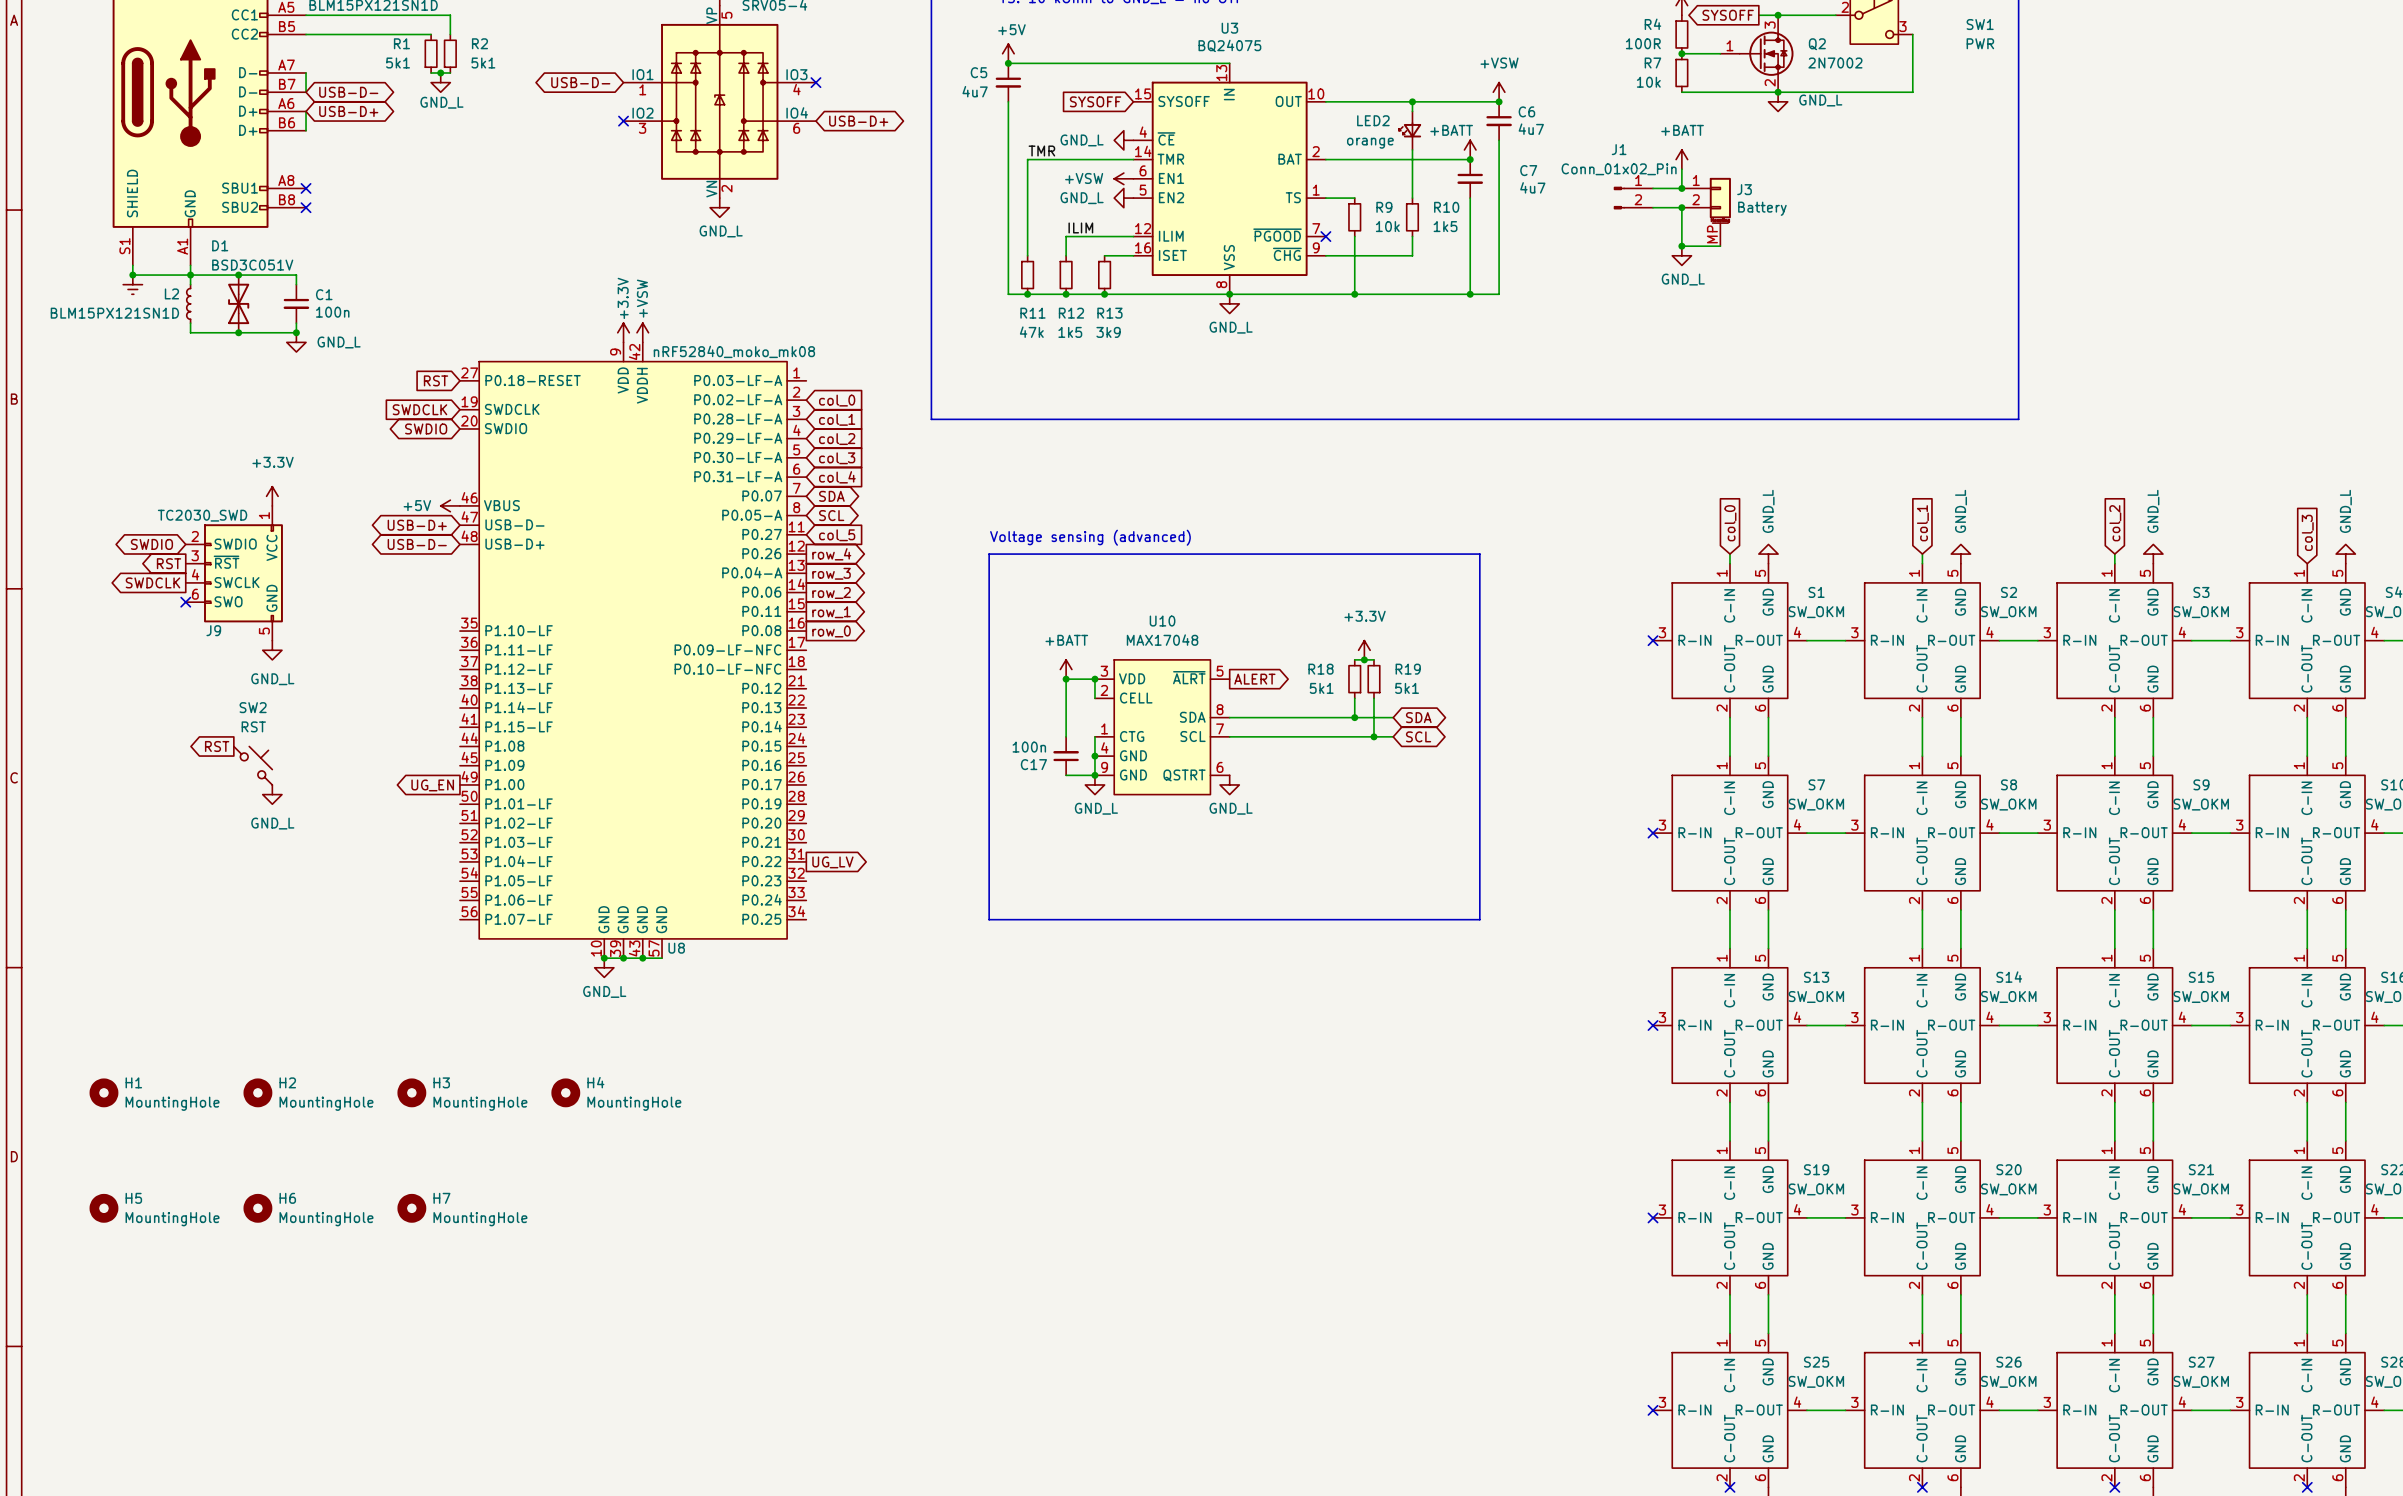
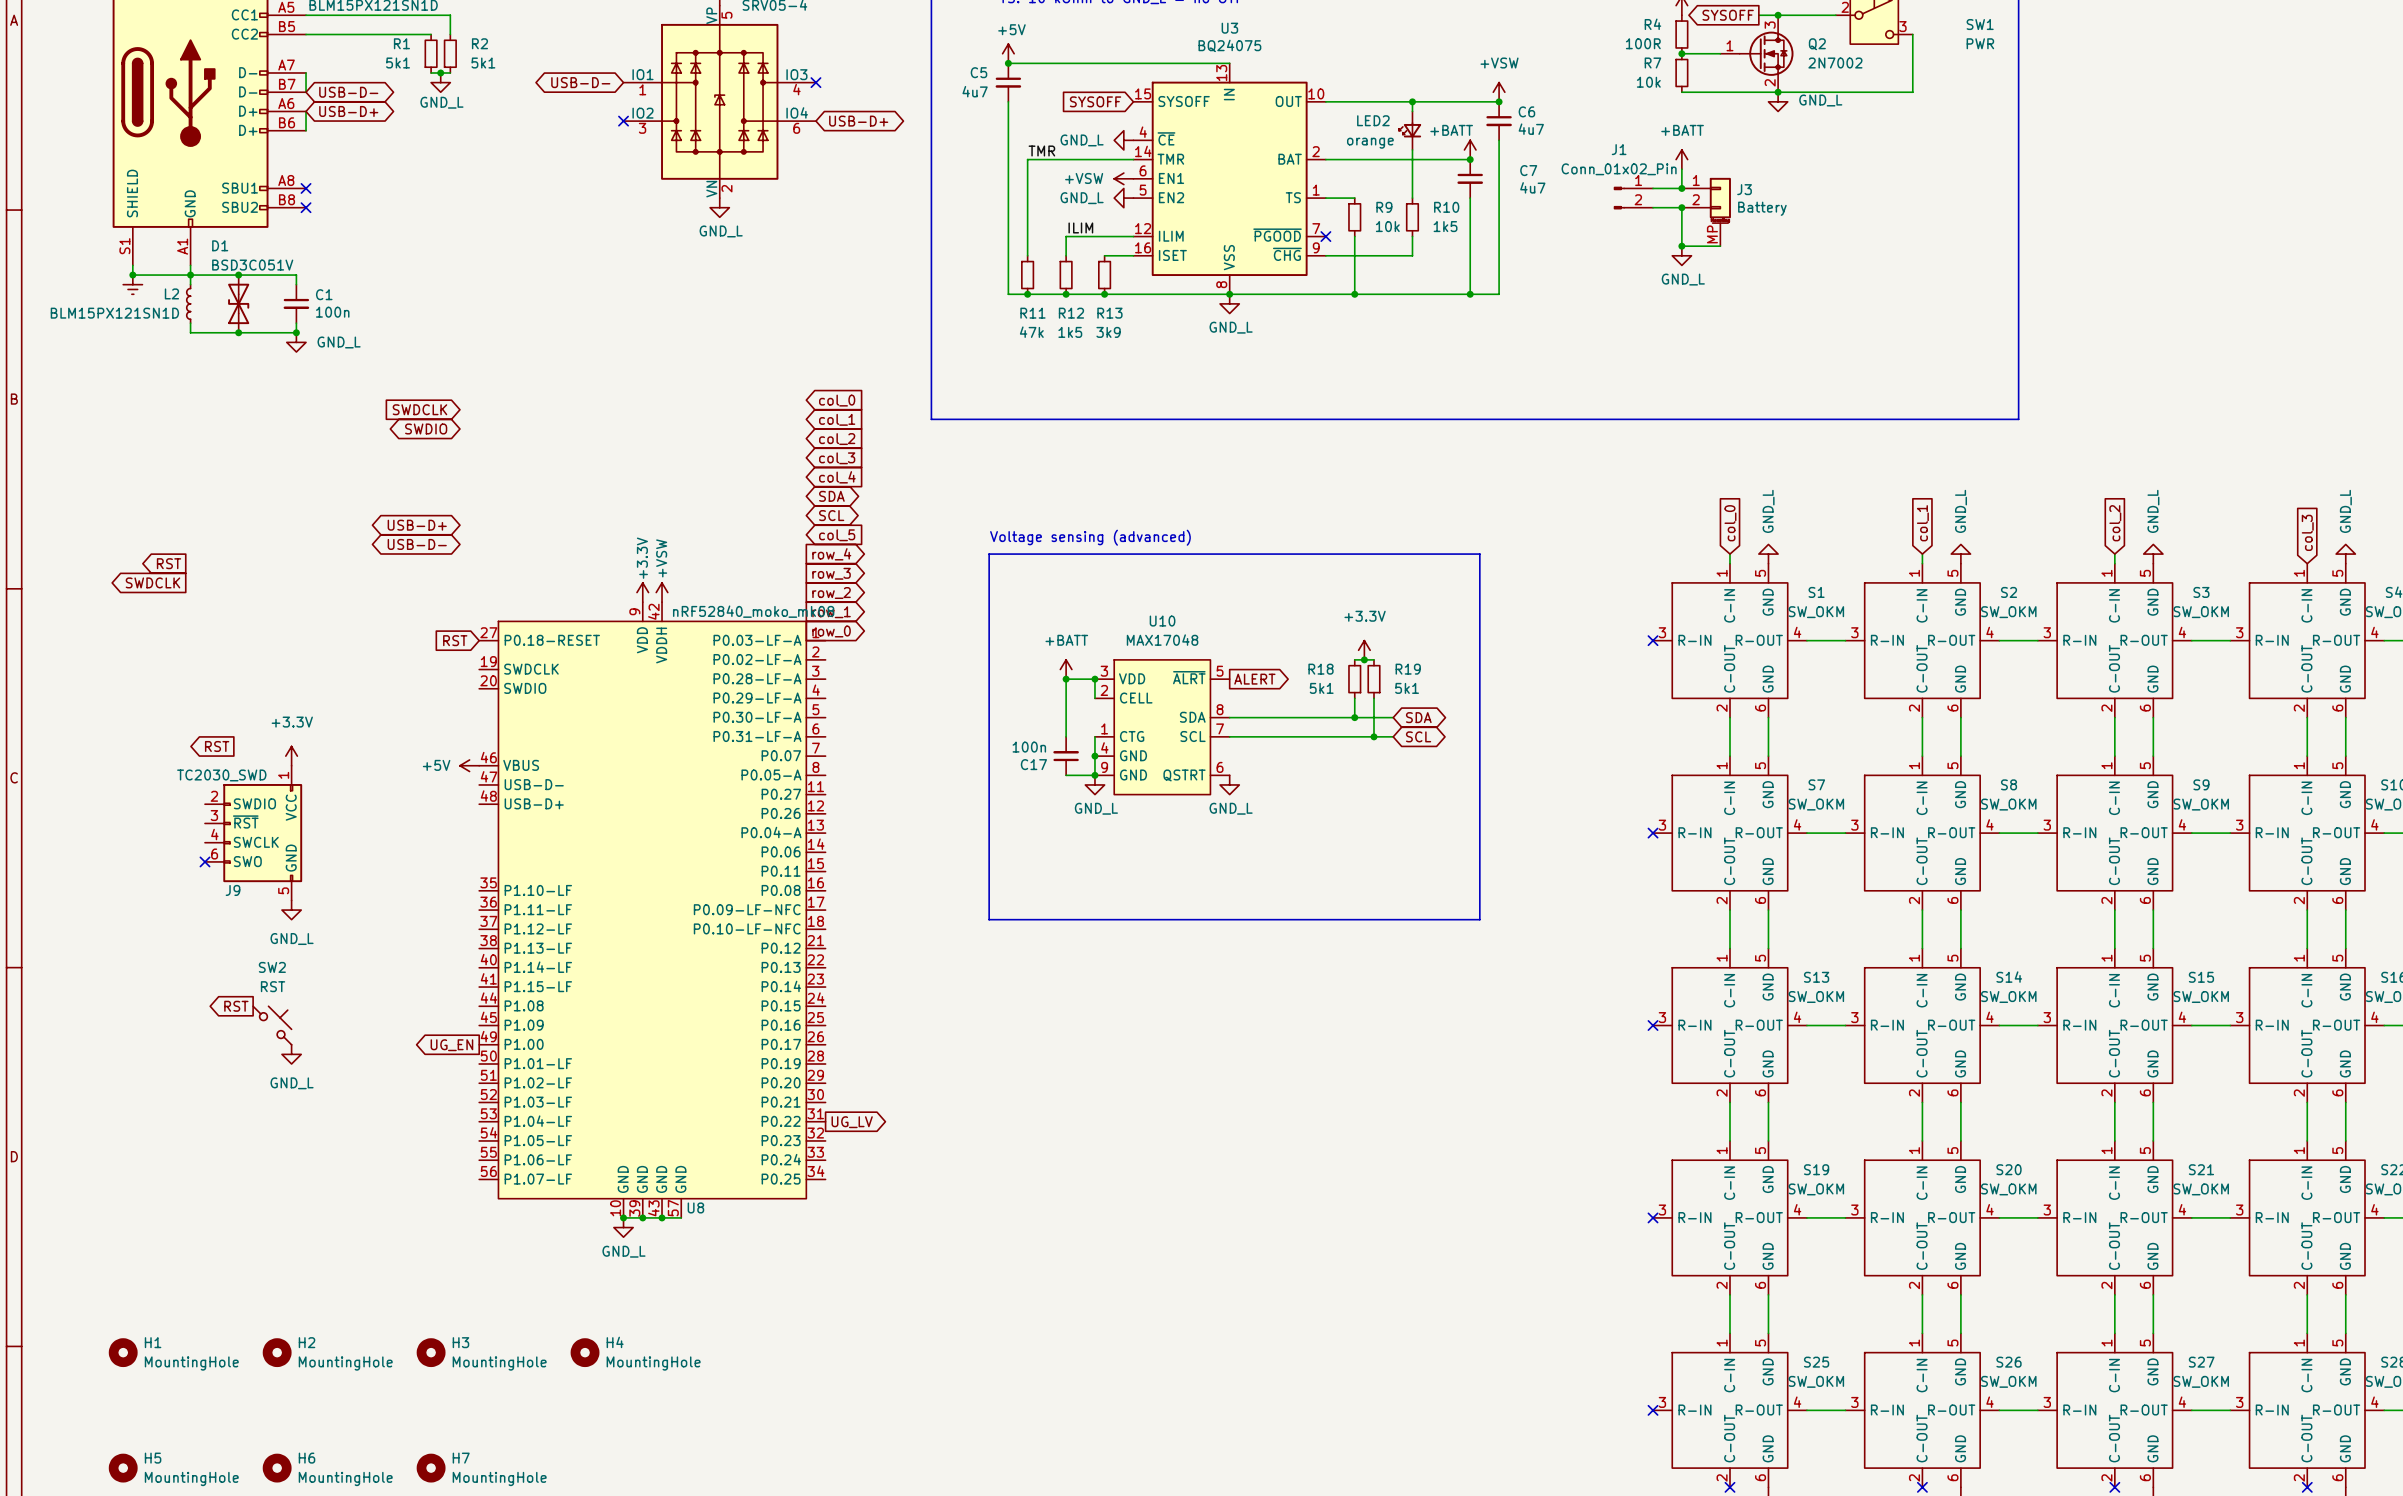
power symbol: +3.3V (623, 332) -> none
power symbol: +VSW (642, 332) -> none
global label: RST (436, 380) -> none
power symbol: +3.3V (272, 496) -> none
power symbol: +5V (450, 505) -> none
global label: SWDIO (151, 544) -> none
J9 position: (234, 573) -> (253, 833)
power symbol: none -> +3.3V (642, 592)
power symbol: none -> +VSW (662, 592)
no-connect mark: (185, 602) -> none
global label: none -> RST (455, 640)
power symbol: GND_L (272, 650) -> none
U8 position: (633, 650) -> (652, 910)
power symbol: none -> +3.3V (291, 756)
SW2 position: (253, 765) -> (272, 1025)
power symbol: none -> +5V (469, 765)
global label: UG_EN (432, 785) -> none
power symbol position: GND_L (272, 794) -> GND_L (291, 910)
no-connect mark: none -> (204, 861)
global label: UG_LV (832, 862) -> none
junction: (604, 958) -> none
junction: (623, 958) -> none
junction: (642, 958) -> none
power symbol: GND_L (604, 967) -> none
global label: none -> RST (236, 1006)
global label: none -> UG_EN (451, 1045)
power symbol: none -> GND_L (291, 1054)
H1 position: (103, 1092) -> (123, 1352)
H2 position: (257, 1092) -> (277, 1352)
H3 position: (411, 1092) -> (431, 1352)
H4 position: (565, 1092) -> (585, 1352)
global label: none -> UG_LV (852, 1122)
H5 position: (103, 1208) -> (123, 1468)
H6 position: (257, 1208) -> (277, 1468)
H7 position: (411, 1208) -> (431, 1468)
wire: none -> (623, 1217) (681, 1217)
junction: none -> (623, 1217)
junction: none -> (642, 1217)
junction: none -> (662, 1217)
power symbol: none -> GND_L (623, 1227)

